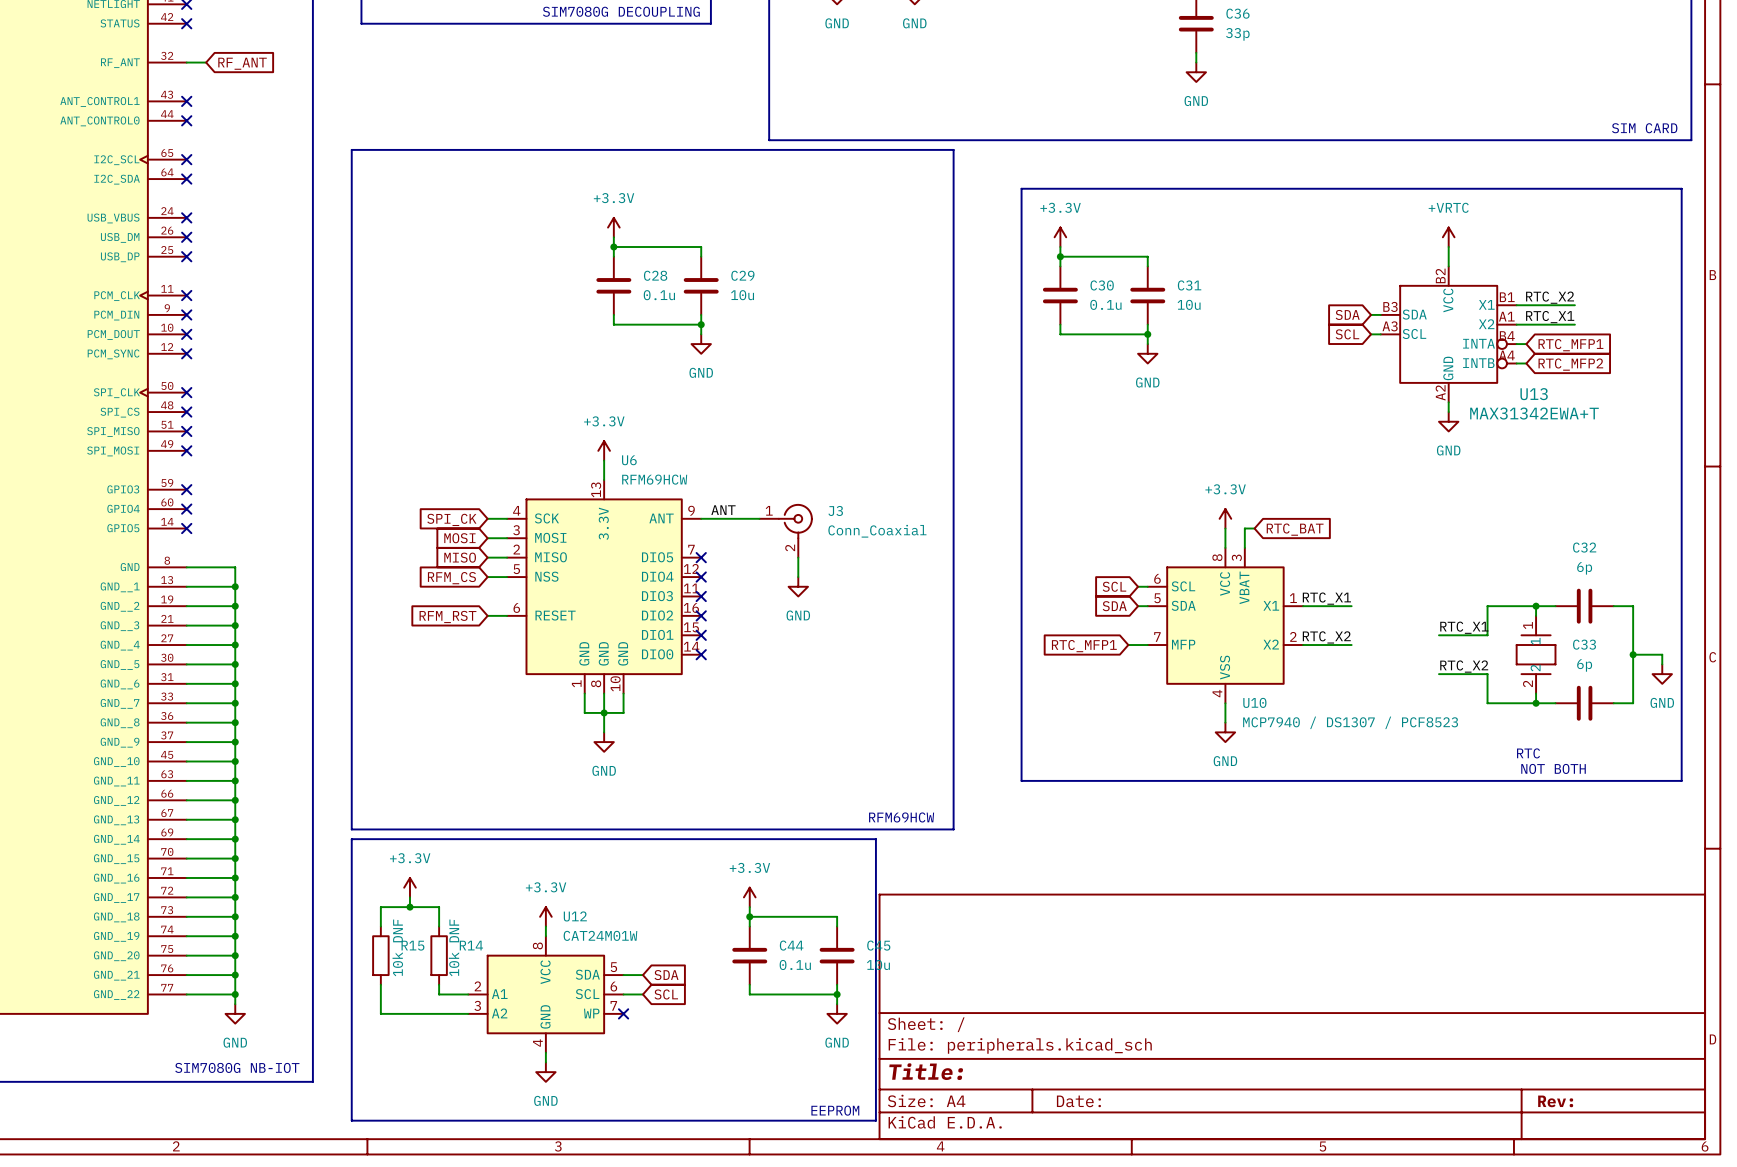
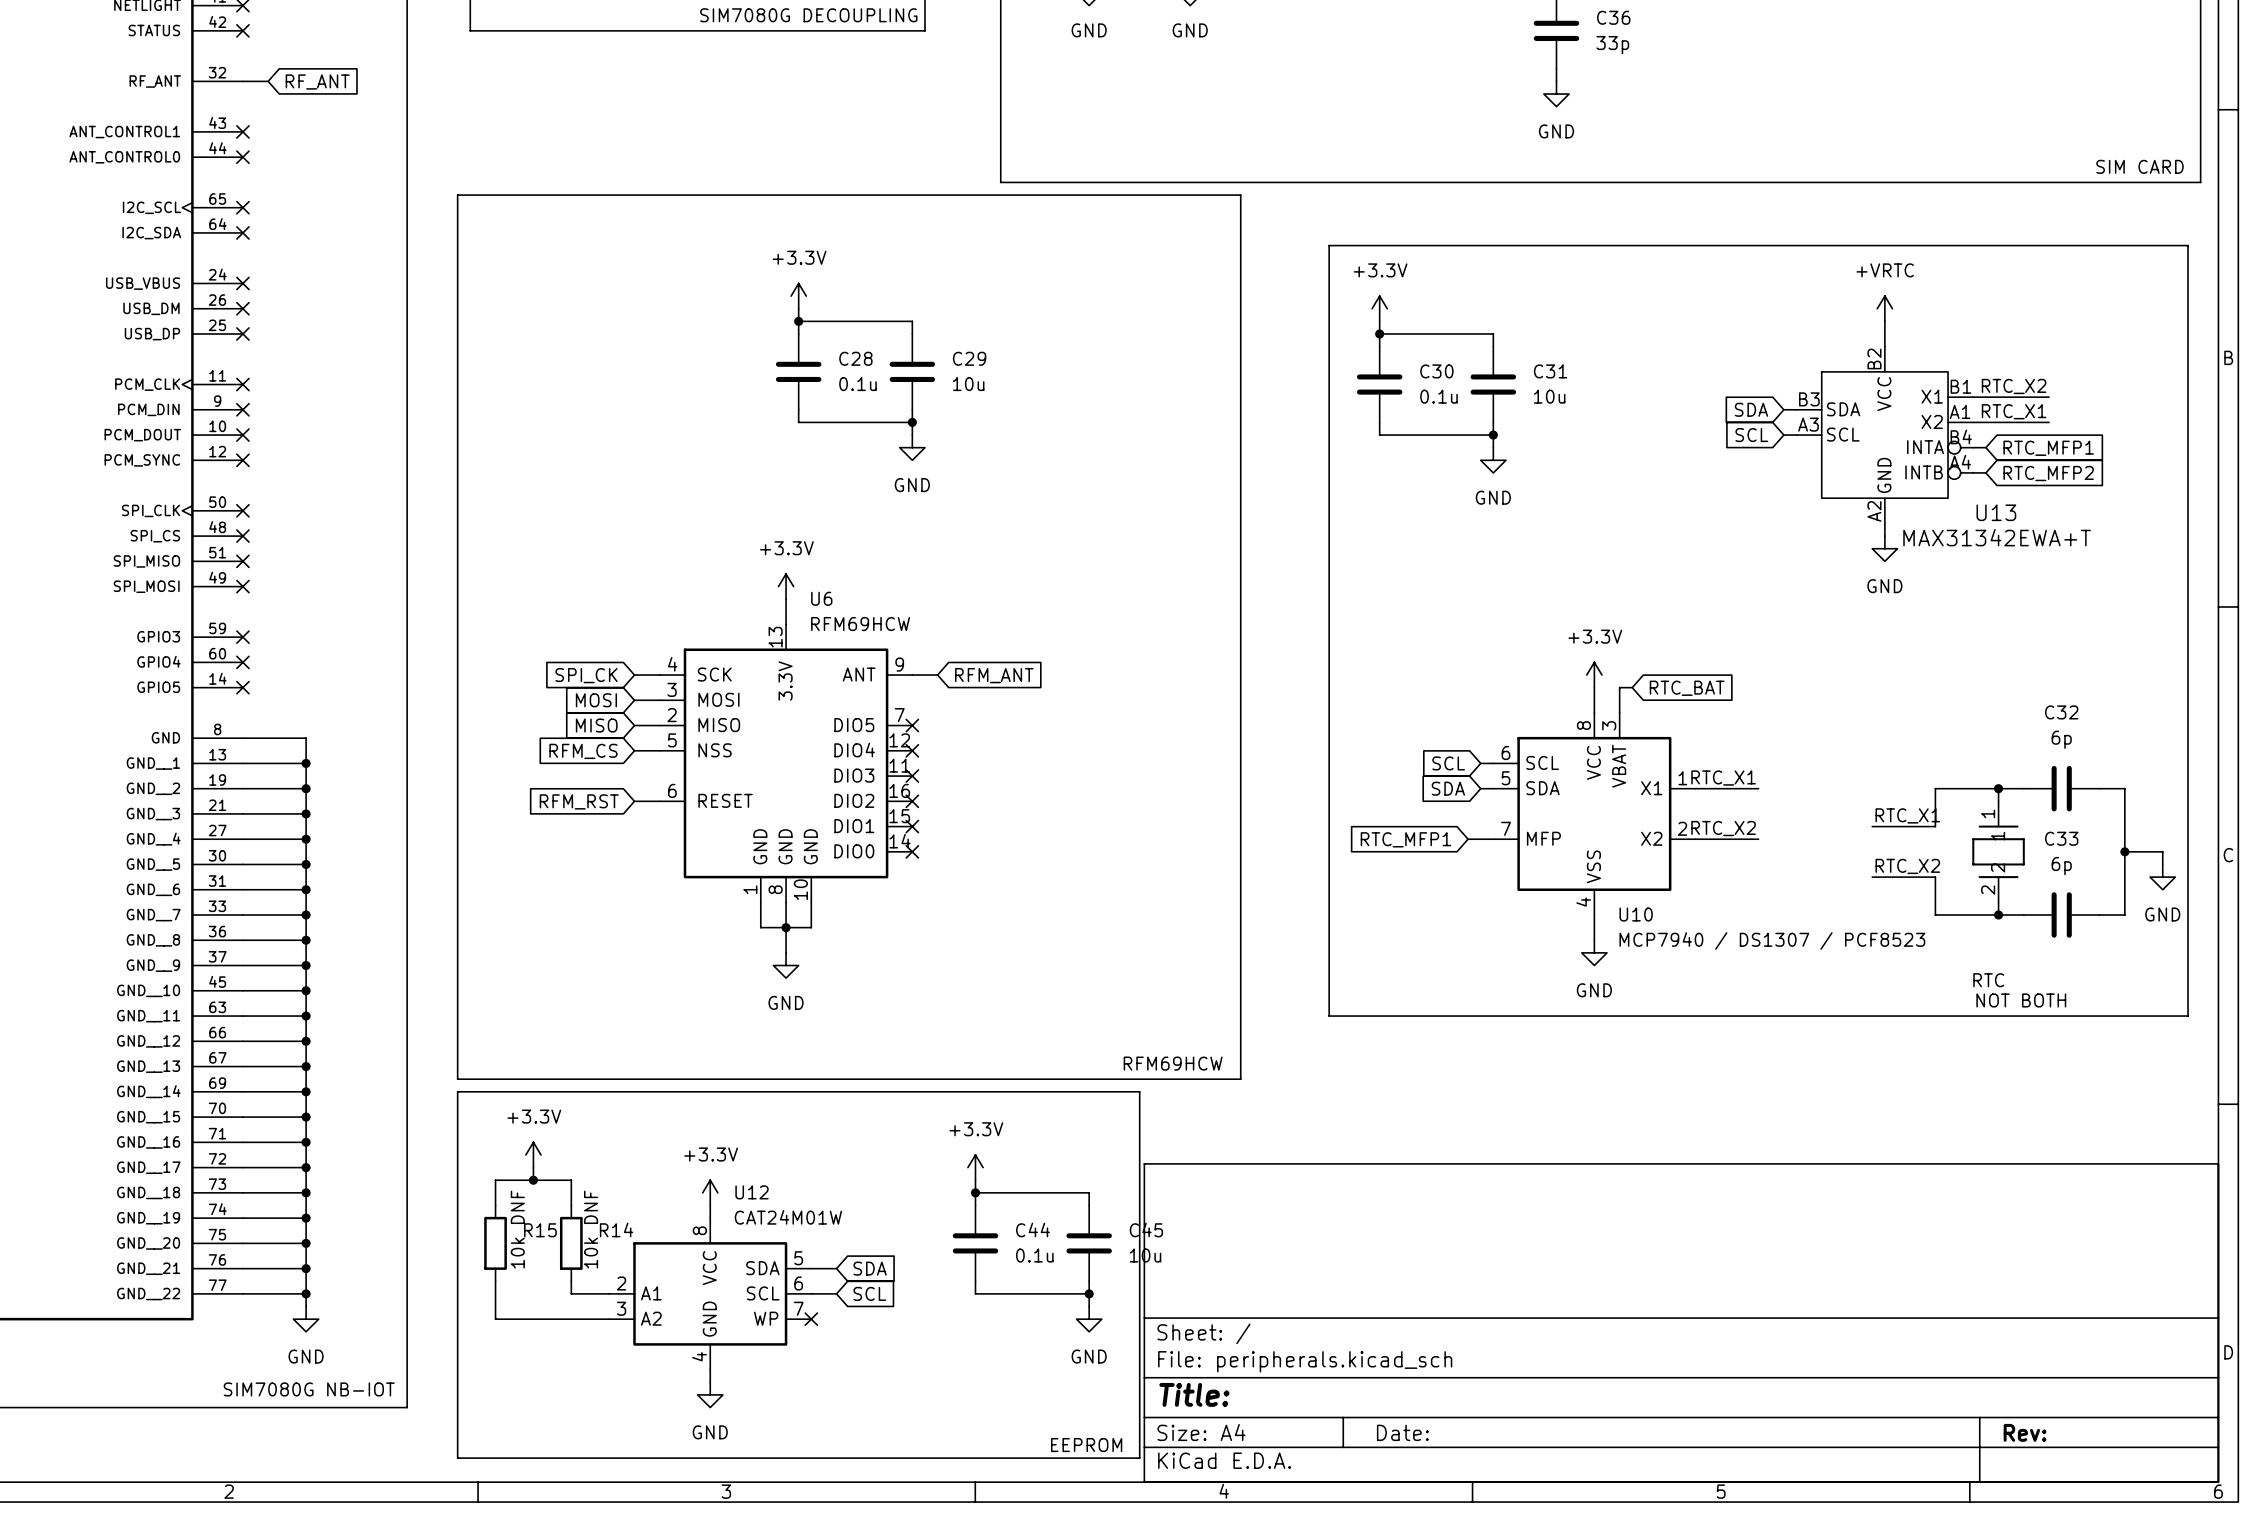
label: ANT (723, 510) -> none
wire: (720, 518) (759, 518) -> none
global label: none -> RFM_ANT (994, 675)
J3: Conn_Coaxial (786, 530) -> none
wire: (798, 557) (798, 577) -> none
power symbol: GND (798, 586) -> none

